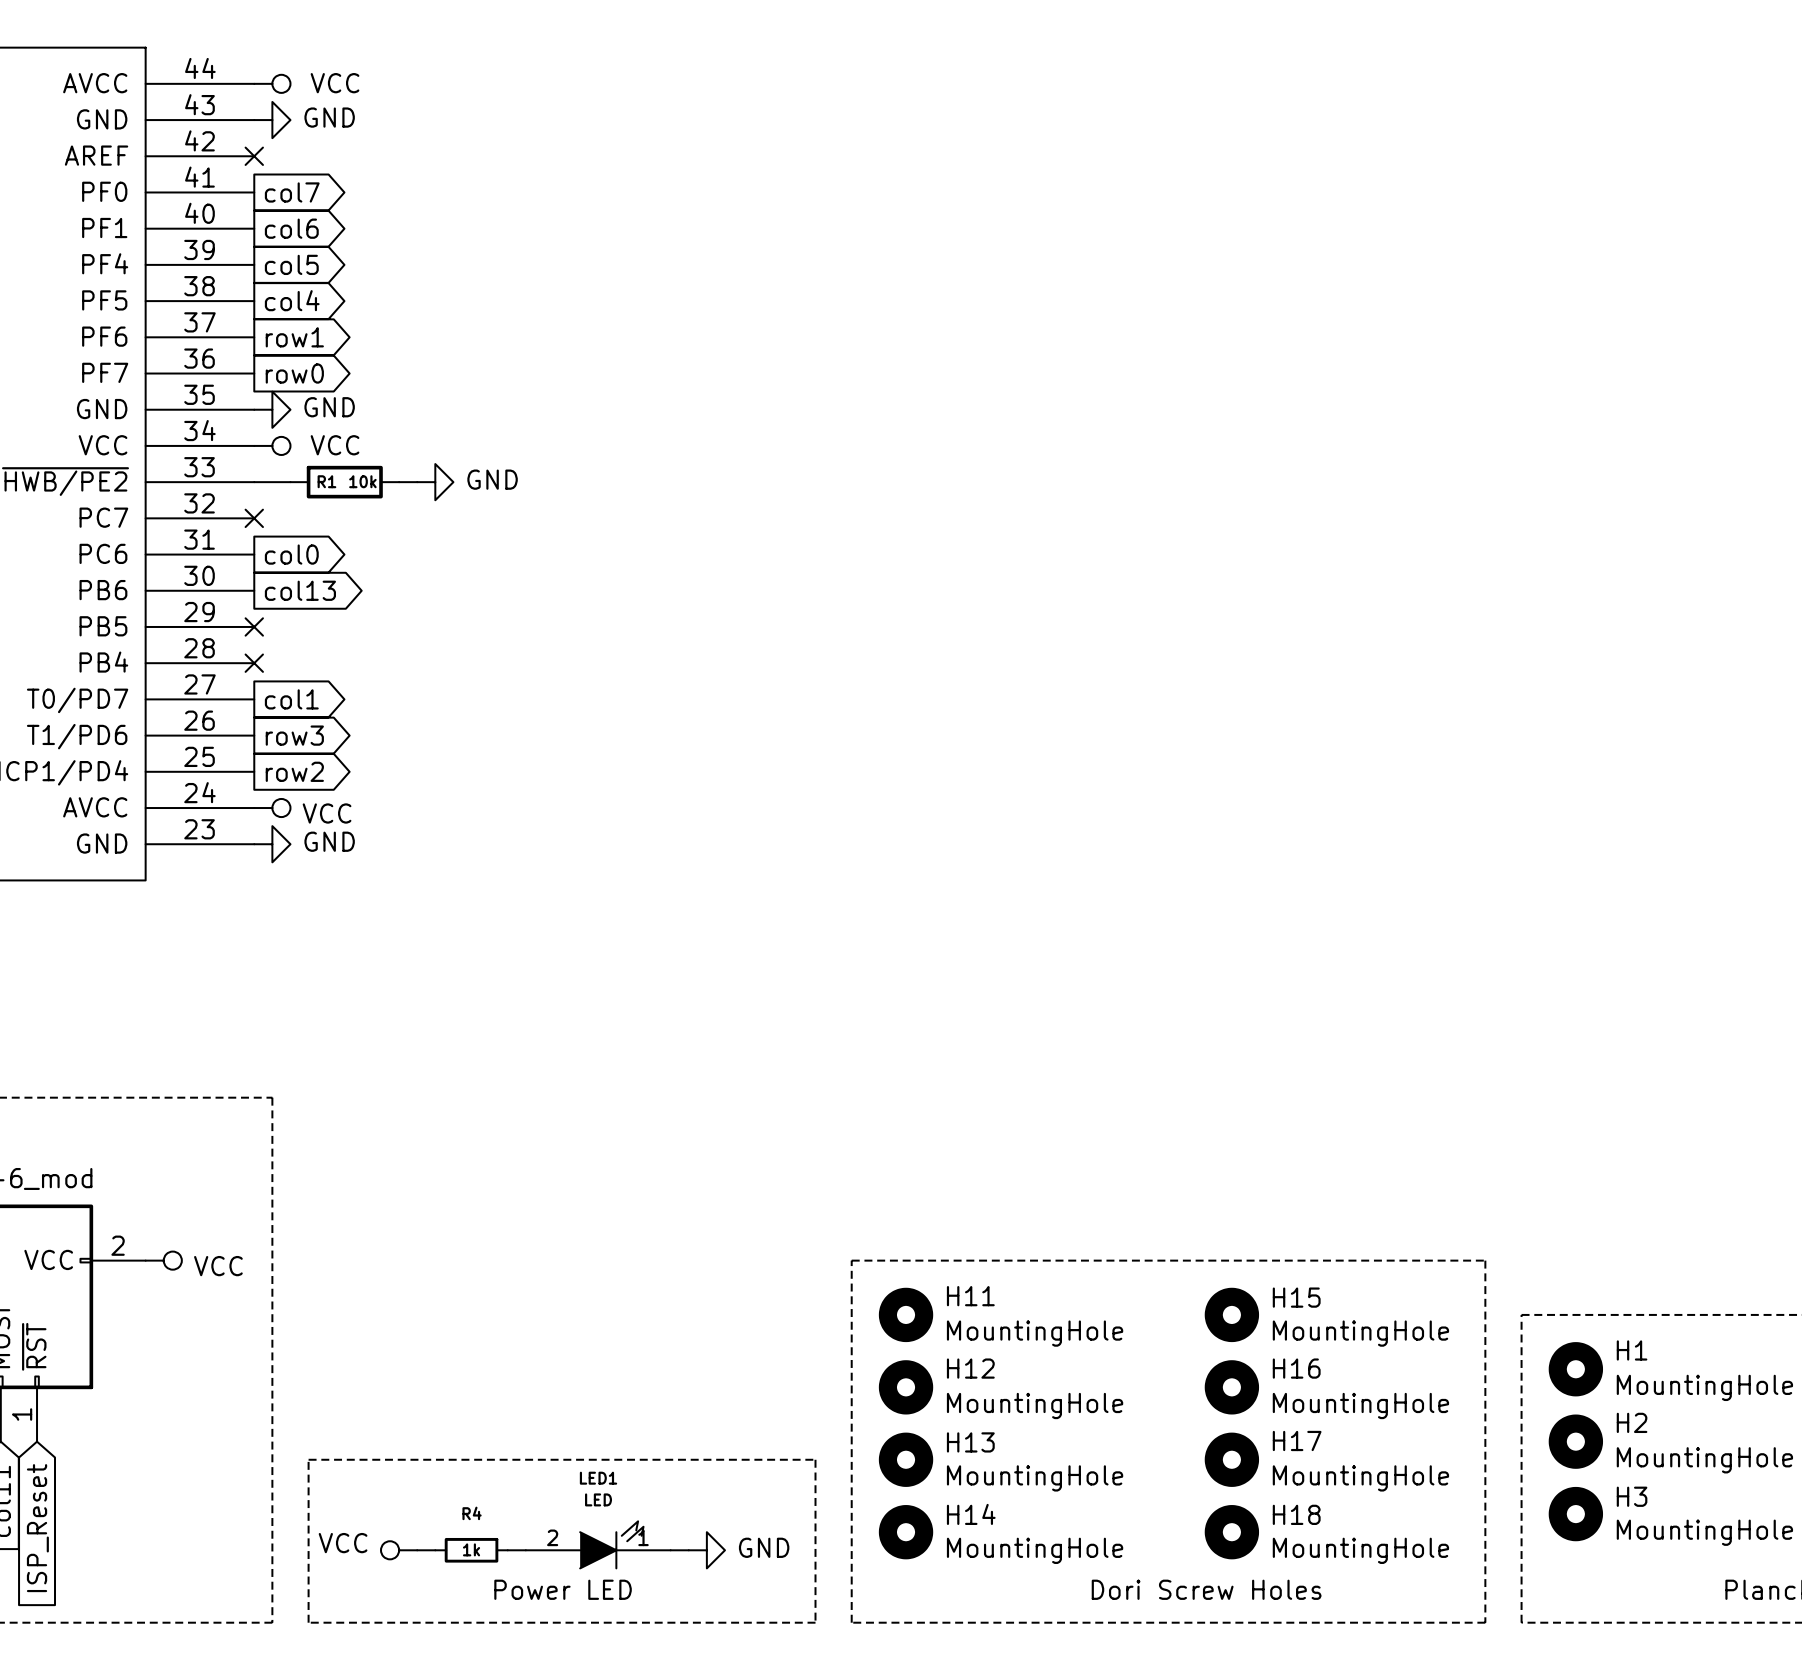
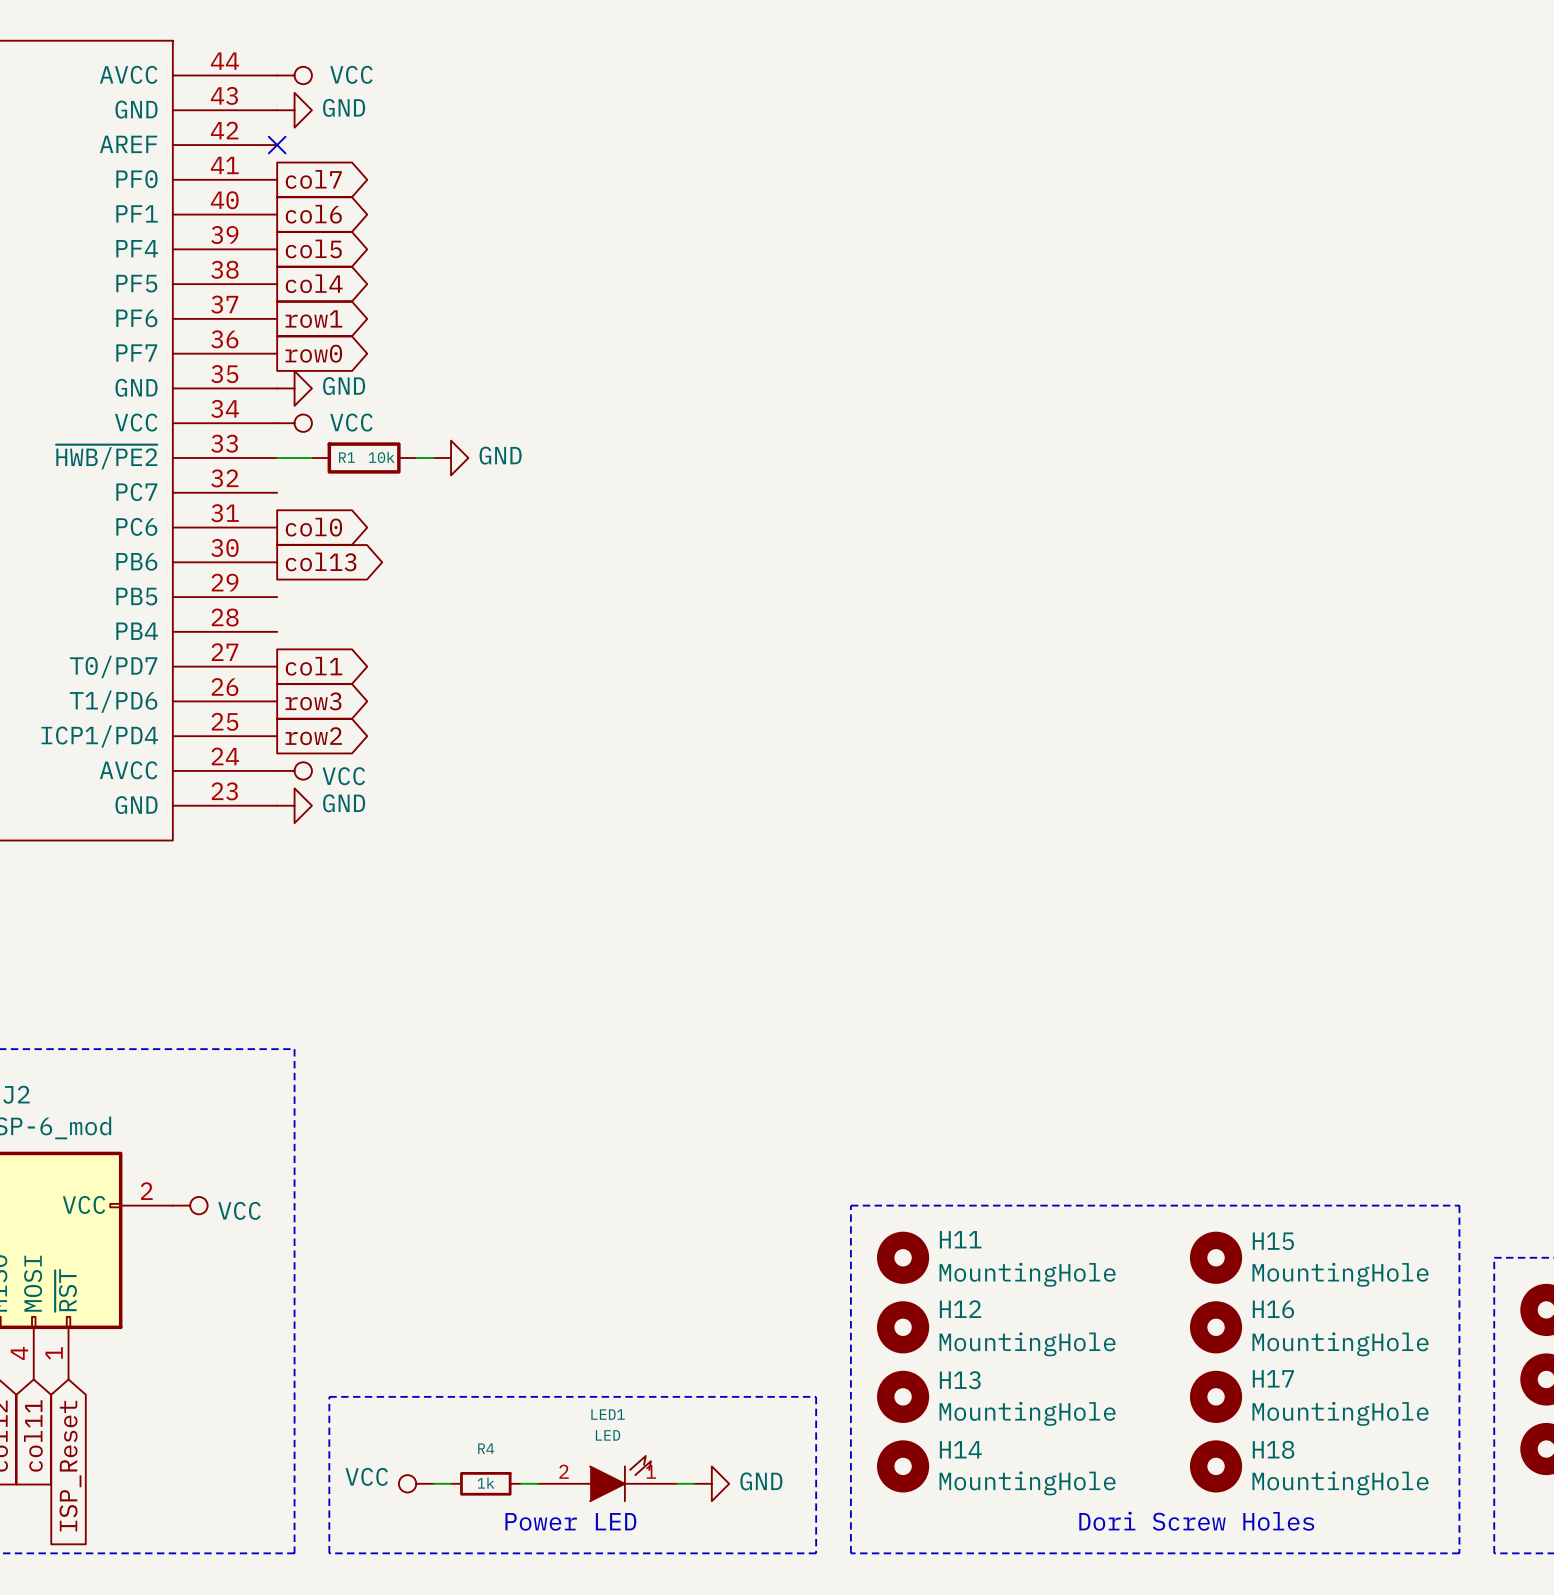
no-connect mark: (254, 518) -> none
no-connect mark: (254, 626) -> none
no-connect mark: (254, 663) -> none

